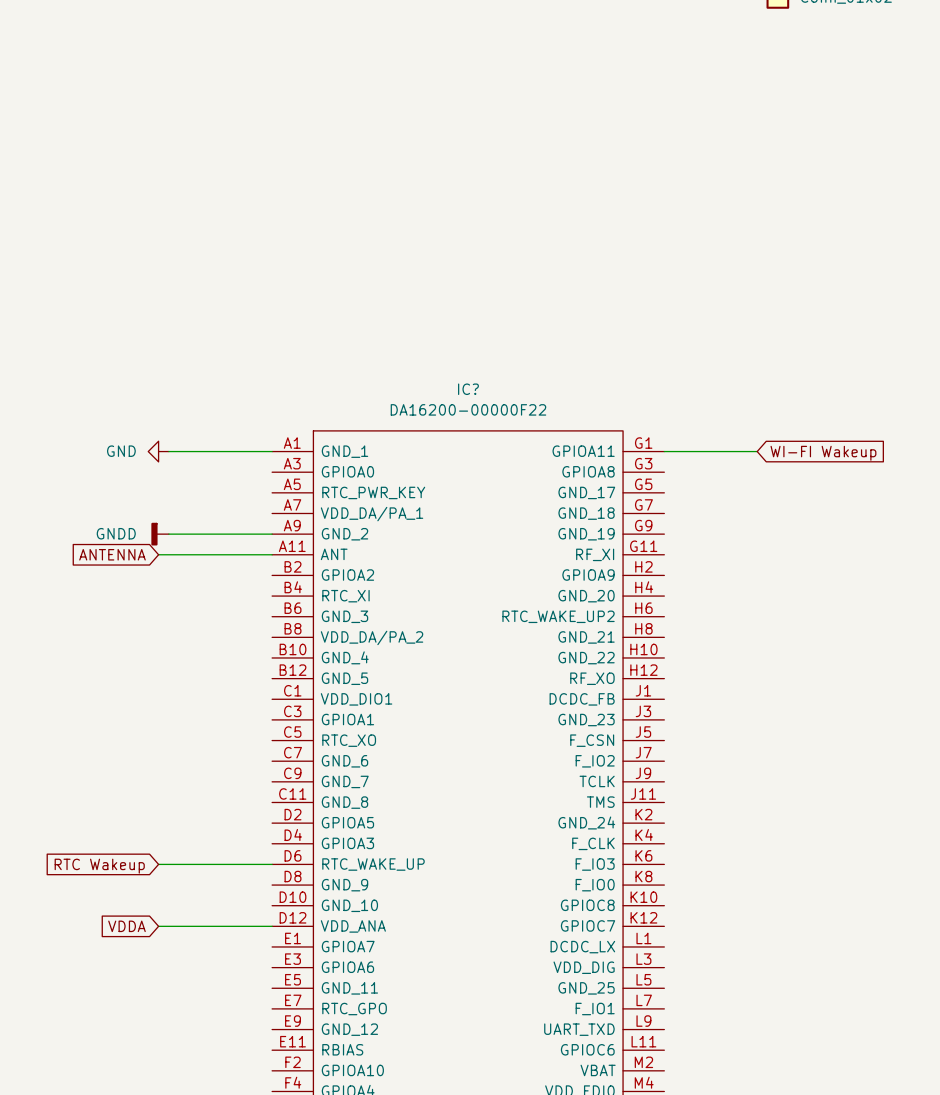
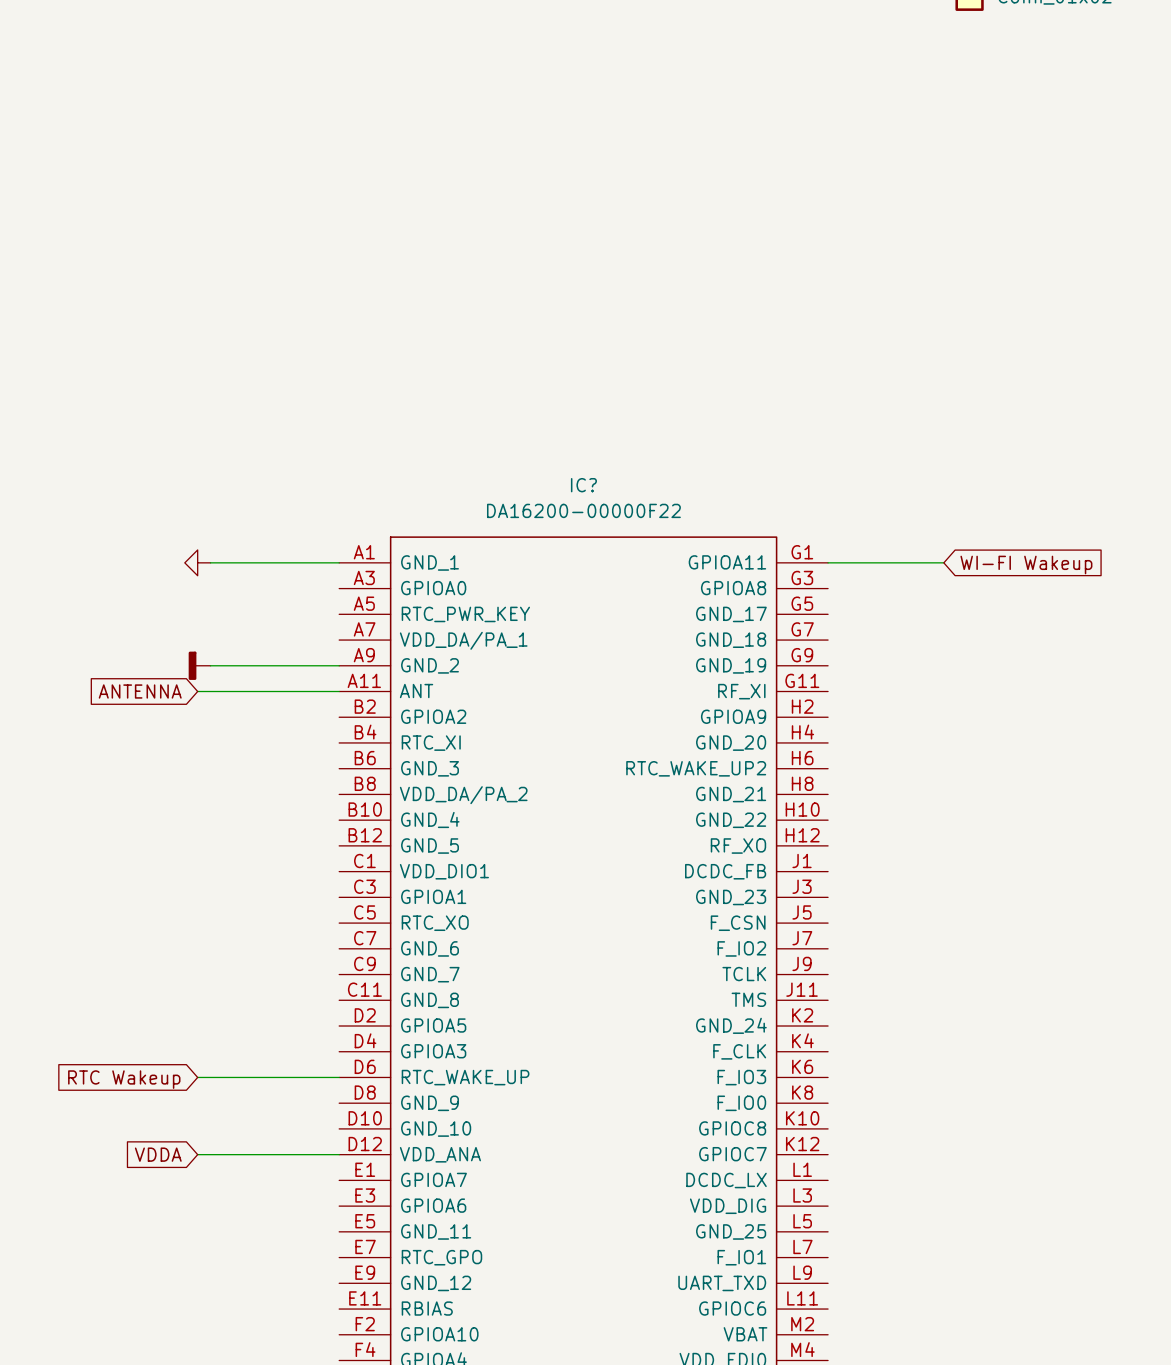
power symbol text: GND (121, 451) -> none
power symbol text: GNDD (116, 533) -> none

